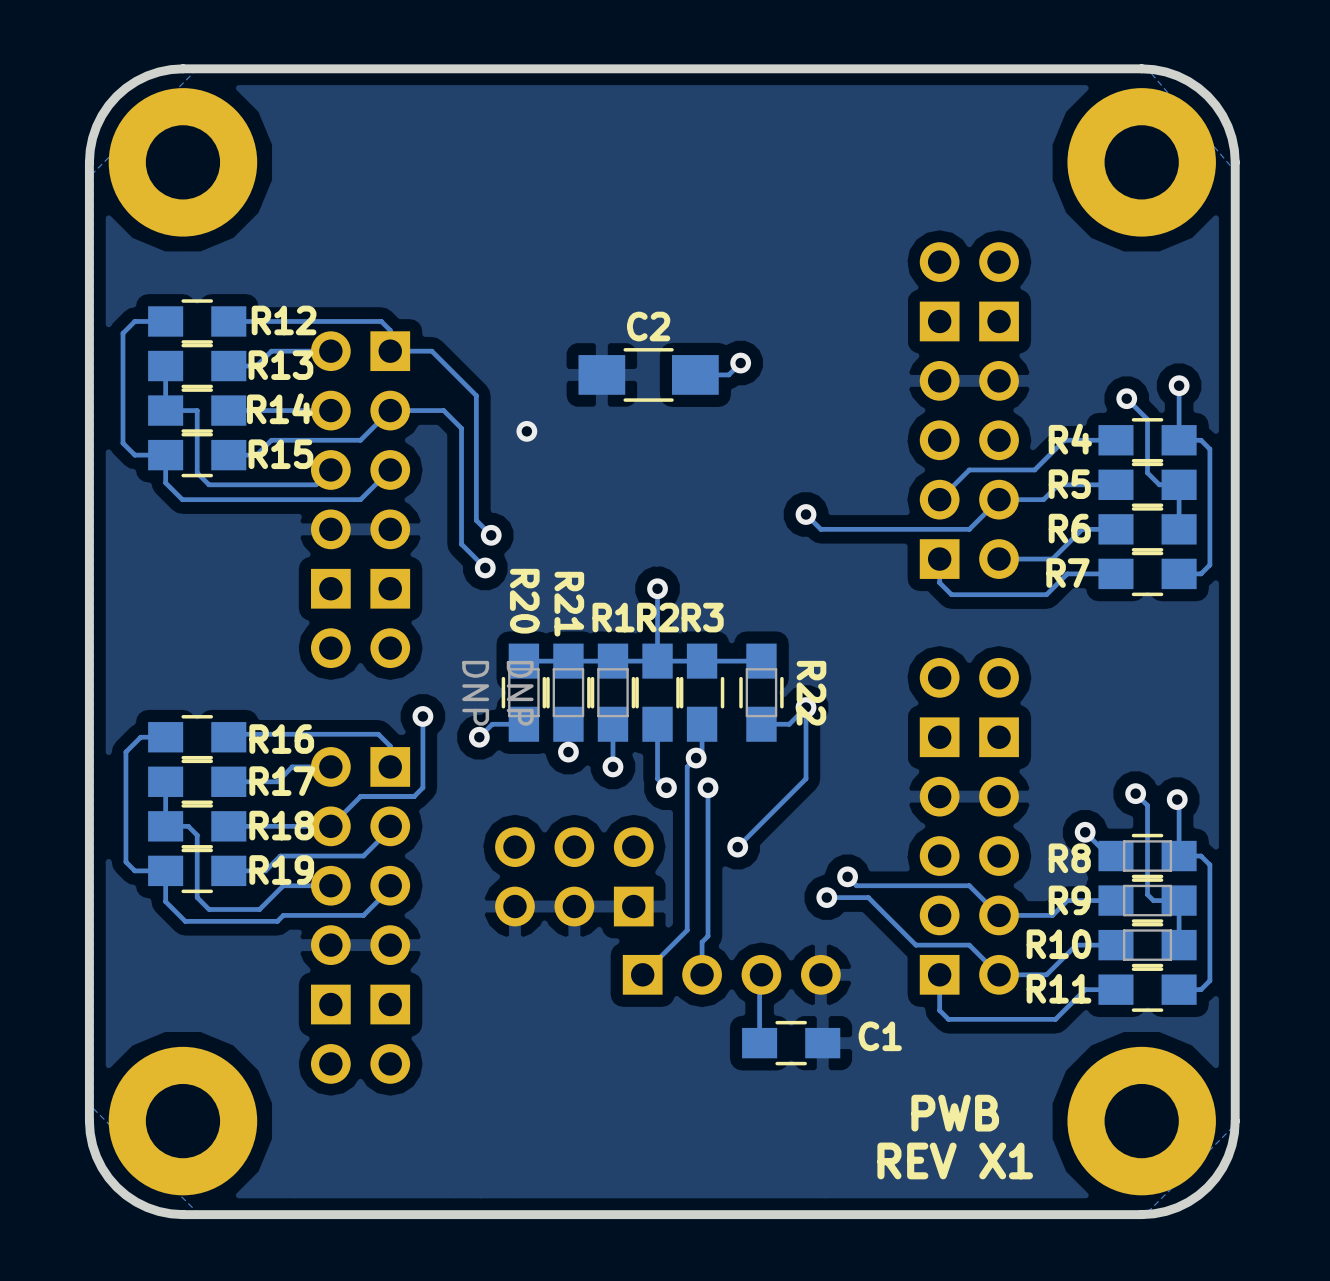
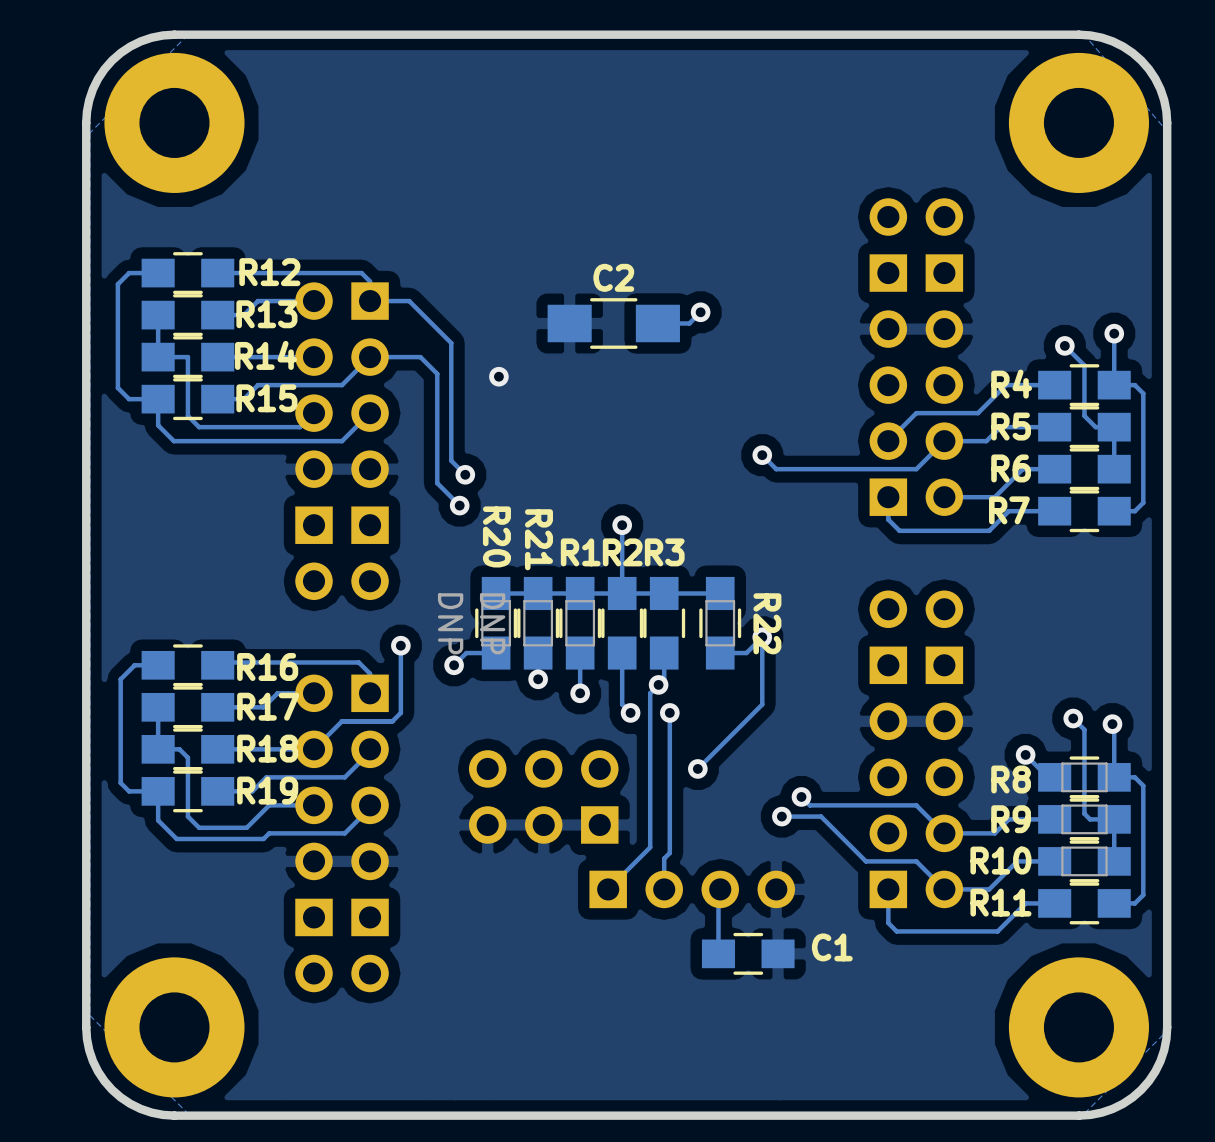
text: PWB (955, 1113) -> none
text: REV X1 (955, 1160) -> none

